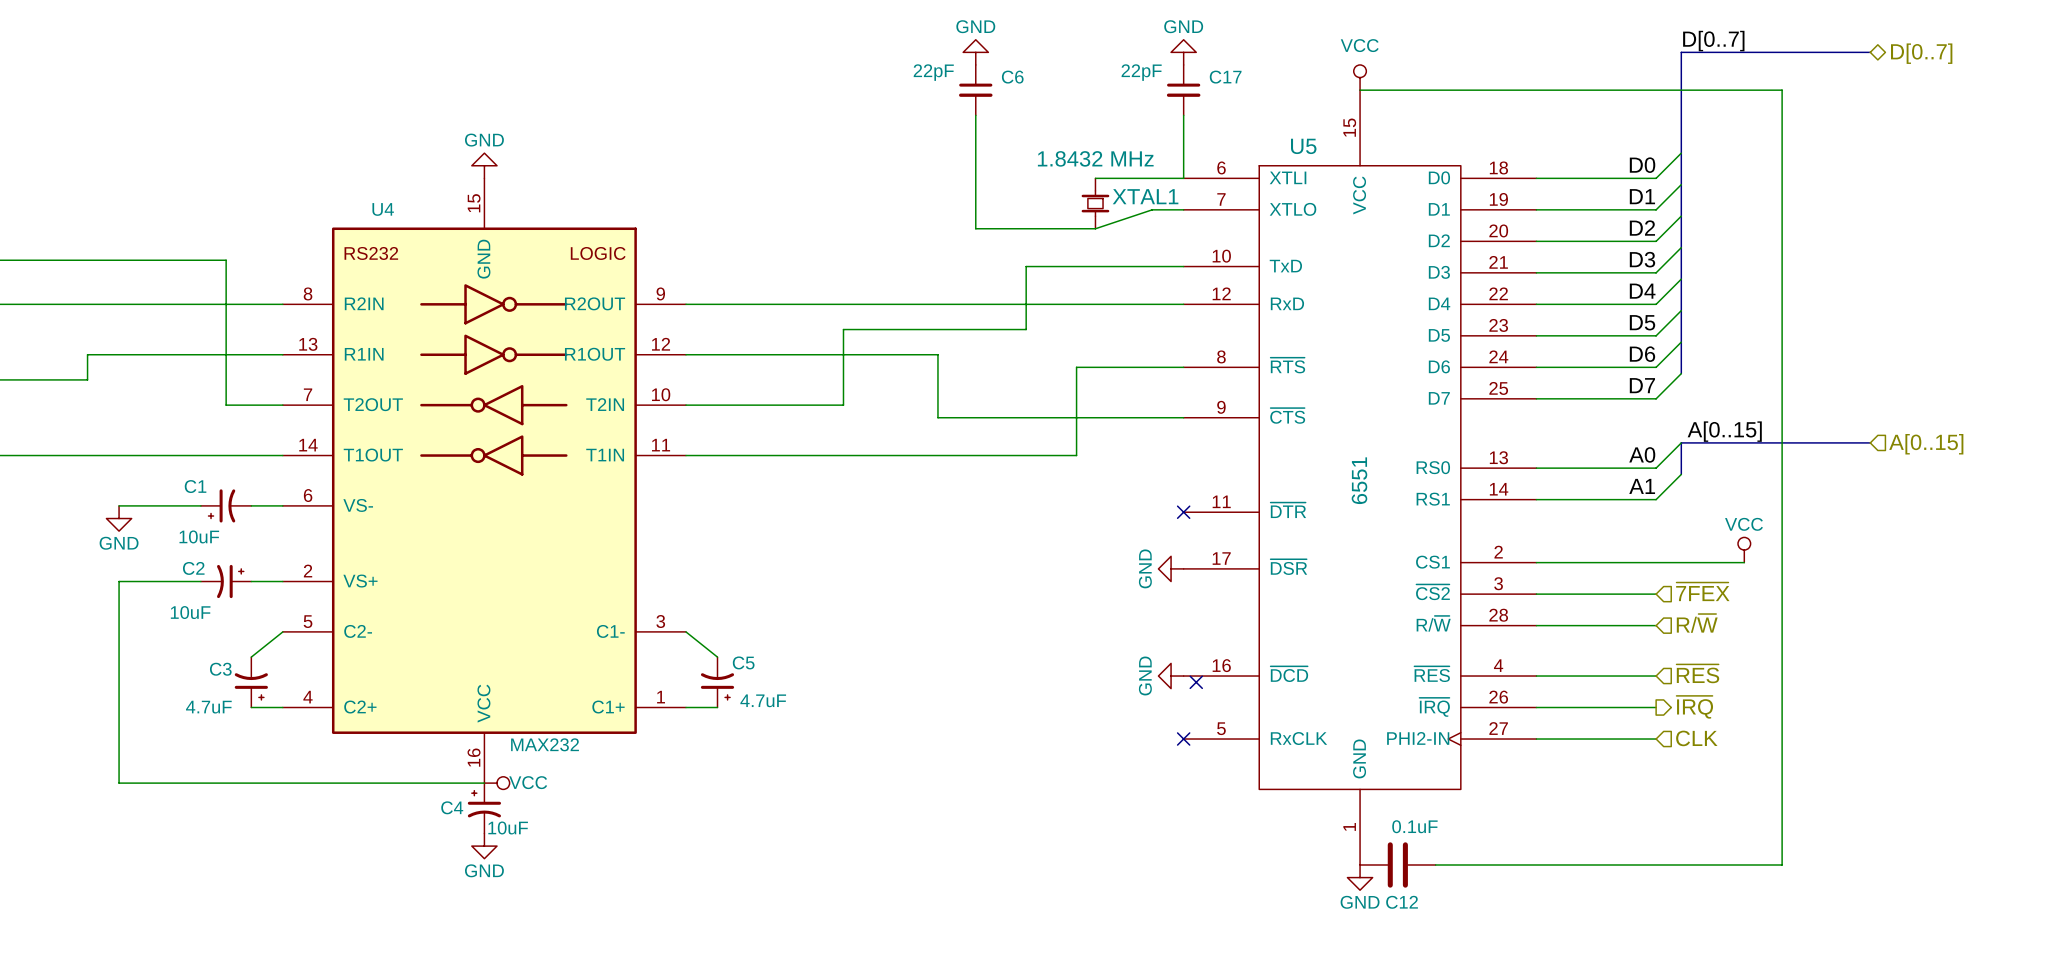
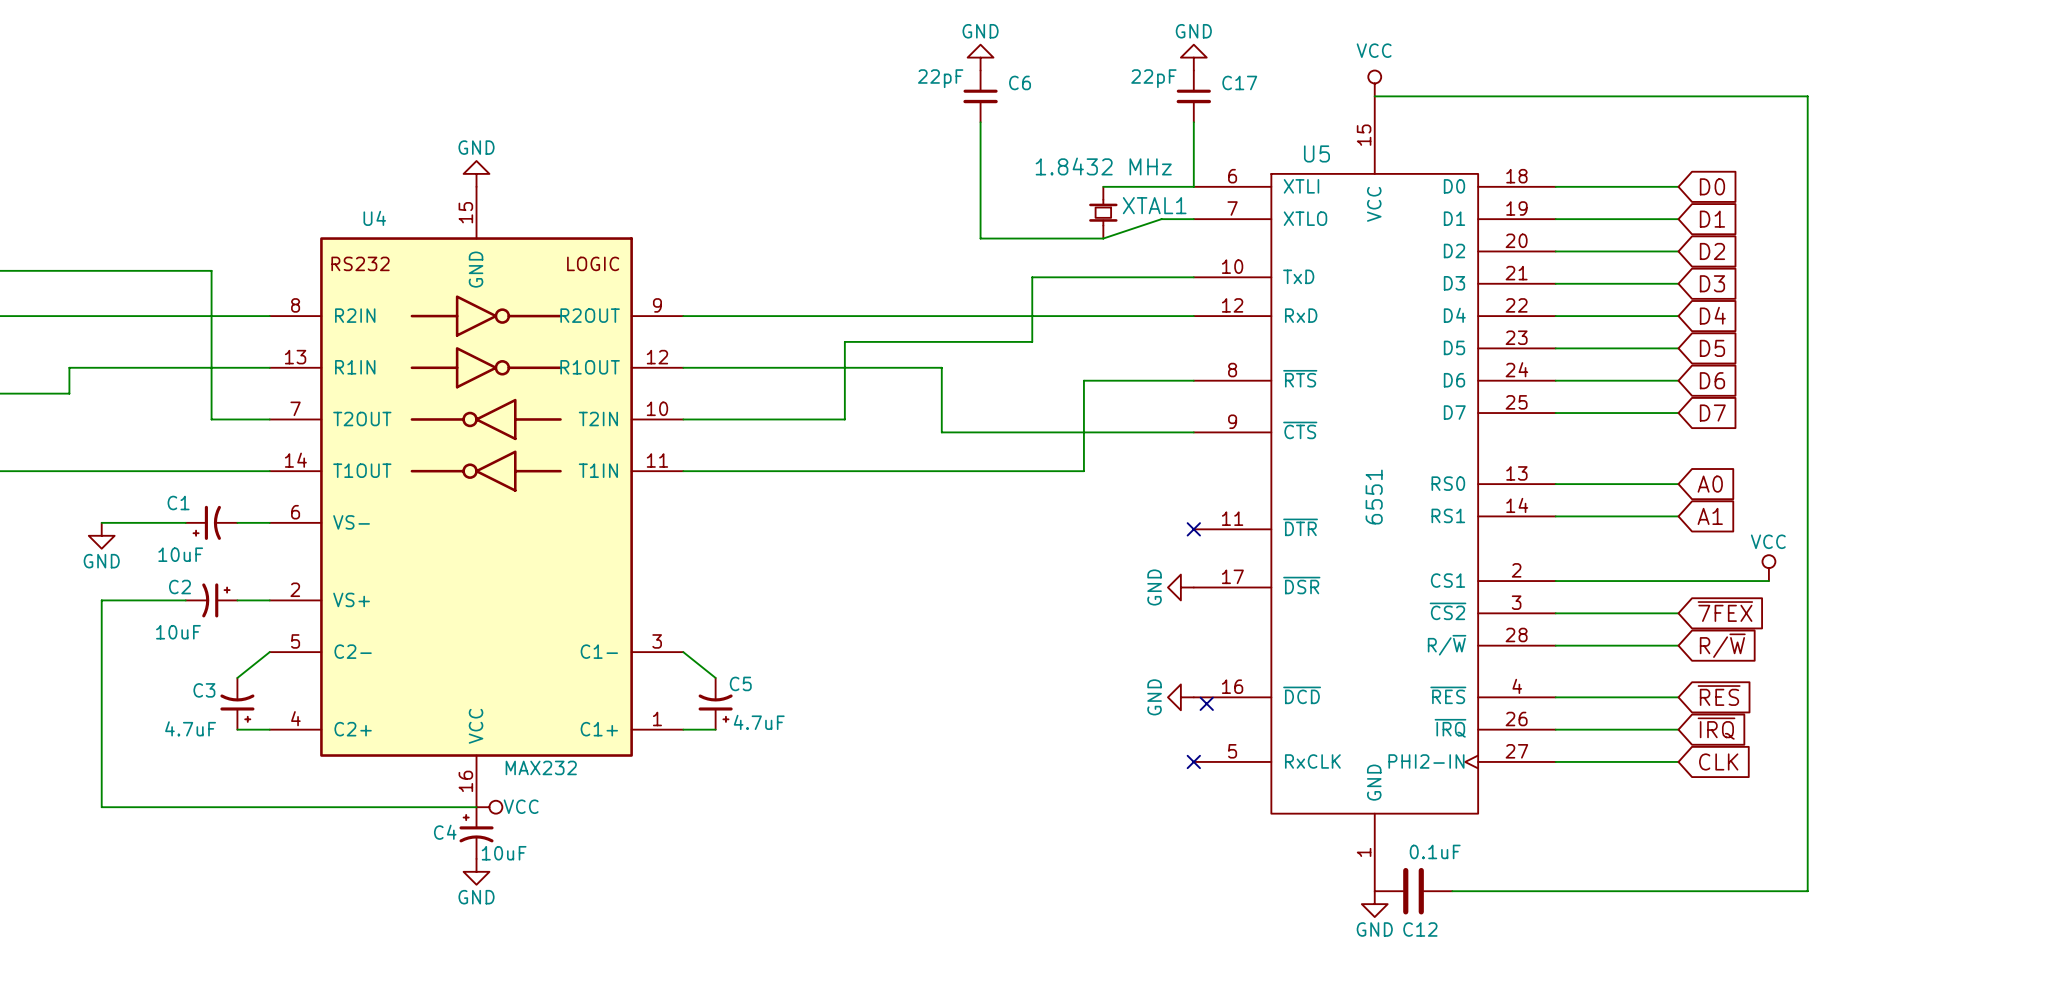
label: D[0..7] (1713, 41) -> none
bus: (1870, 52) (1681, 52) (1681, 373) -> none
hierarchical label: D[0..7] (1921, 53) -> none
wire: (1681, 153) (1656, 178) -> none
label: D0 (1642, 165) -> none
global label: none -> D0 (1712, 186)
wire: (1681, 184) (1656, 209) -> none
label: D1 (1642, 196) -> none
global label: none -> D1 (1712, 219)
wire: (1681, 216) (1656, 241) -> none
label: D2 (1642, 228) -> none
global label: none -> D2 (1712, 251)
wire: (1681, 247) (1656, 272) -> none
label: D3 (1642, 259) -> none
global label: none -> D3 (1712, 283)
wire: (1681, 279) (1656, 304) -> none
label: D4 (1642, 291) -> none
global label: none -> D4 (1712, 315)
wire: (1681, 310) (1656, 335) -> none
label: D5 (1642, 322) -> none
global label: none -> D5 (1712, 348)
wire: (1681, 342) (1656, 367) -> none
label: D6 (1642, 354) -> none
global label: none -> D6 (1712, 380)
wire: (1681, 373) (1656, 398) -> none
label: D7 (1642, 385) -> none
global label: none -> D7 (1712, 413)
label: A[0..15] (1724, 431) -> none
wire: (1681, 442) (1656, 468) -> none
bus: (1870, 442) (1681, 442) (1681, 474) -> none
hierarchical label: A[0..15] (1926, 444) -> none
label: A0 (1642, 454) -> none
global label: none -> A0 (1710, 484)
wire: (1681, 474) (1656, 499) -> none
label: A1 (1642, 486) -> none
global label: none -> A1 (1710, 516)
hierarchical label: ~{7FEX} (1702, 591) -> none
global label: none -> ~{7FEX} (1725, 611)
global label: none -> R/~{W} (1722, 645)
hierarchical label: R/~{W} (1697, 623) -> none
hierarchical label: ~{RES} (1697, 673) -> none
global label: none -> ~{RES} (1719, 695)
global label: none -> ~{IRQ} (1716, 728)
hierarchical label: ~{IRQ} (1694, 707) -> none
hierarchical label: CLK (1696, 738) -> none
global label: none -> CLK (1718, 761)

